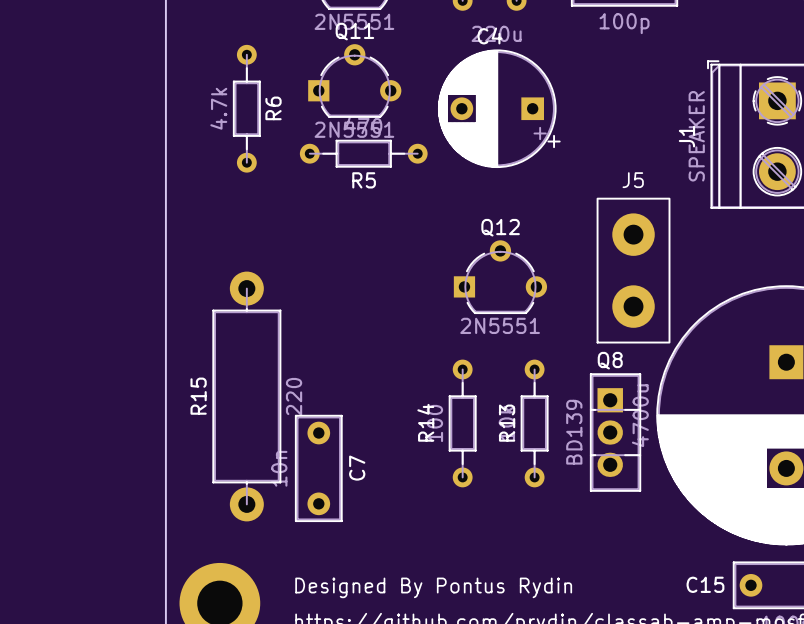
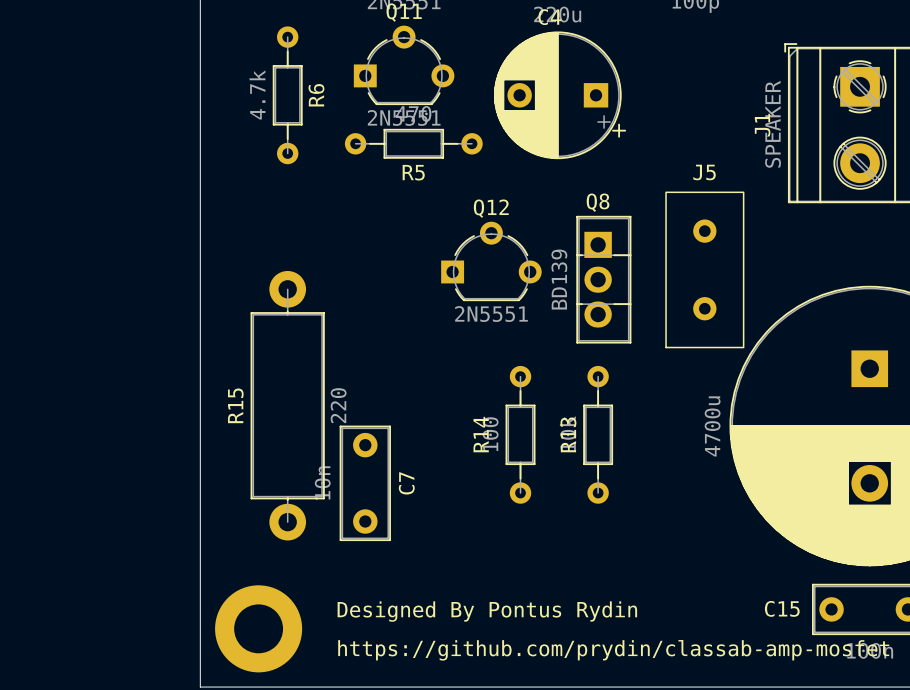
J5 footprint: [596, 197, 671, 344] -> [665, 191, 745, 349]
Q12 position: (500, 277) -> (491, 261)
Q8 position: (615, 432) -> (603, 279)

